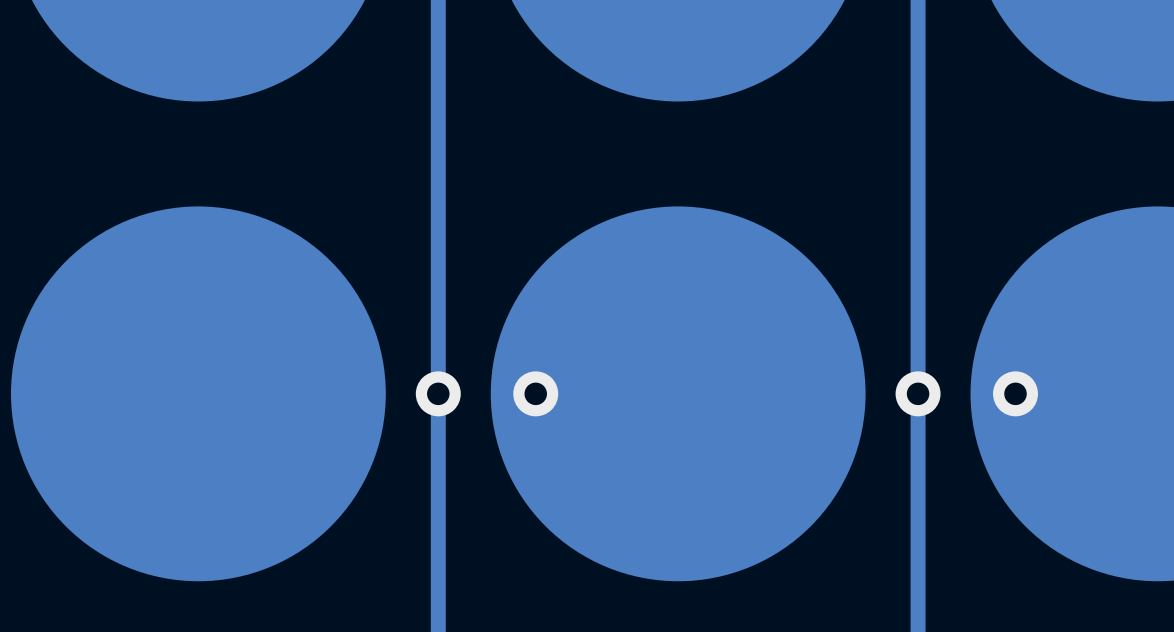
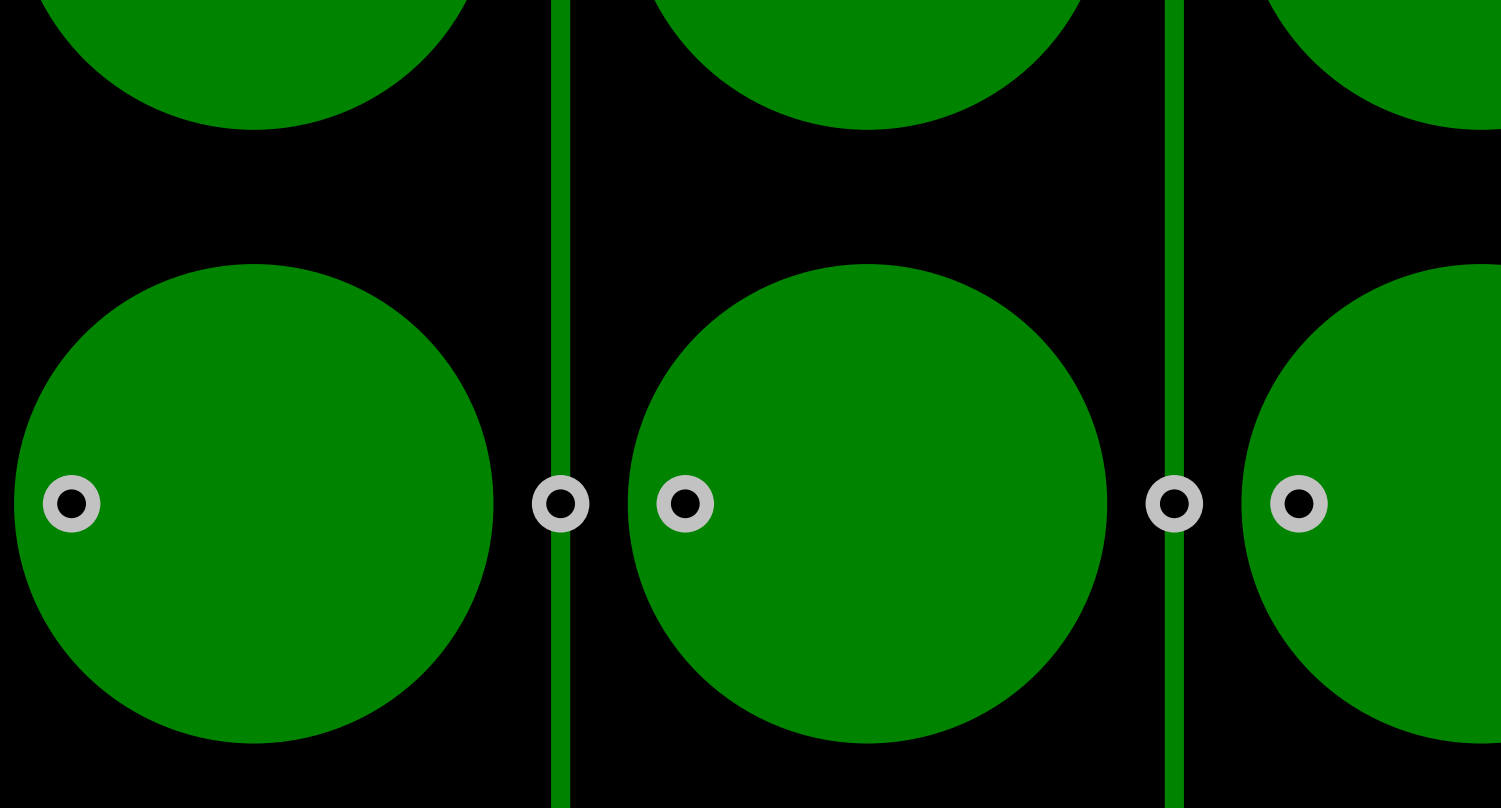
via: none -> (71, 503)

